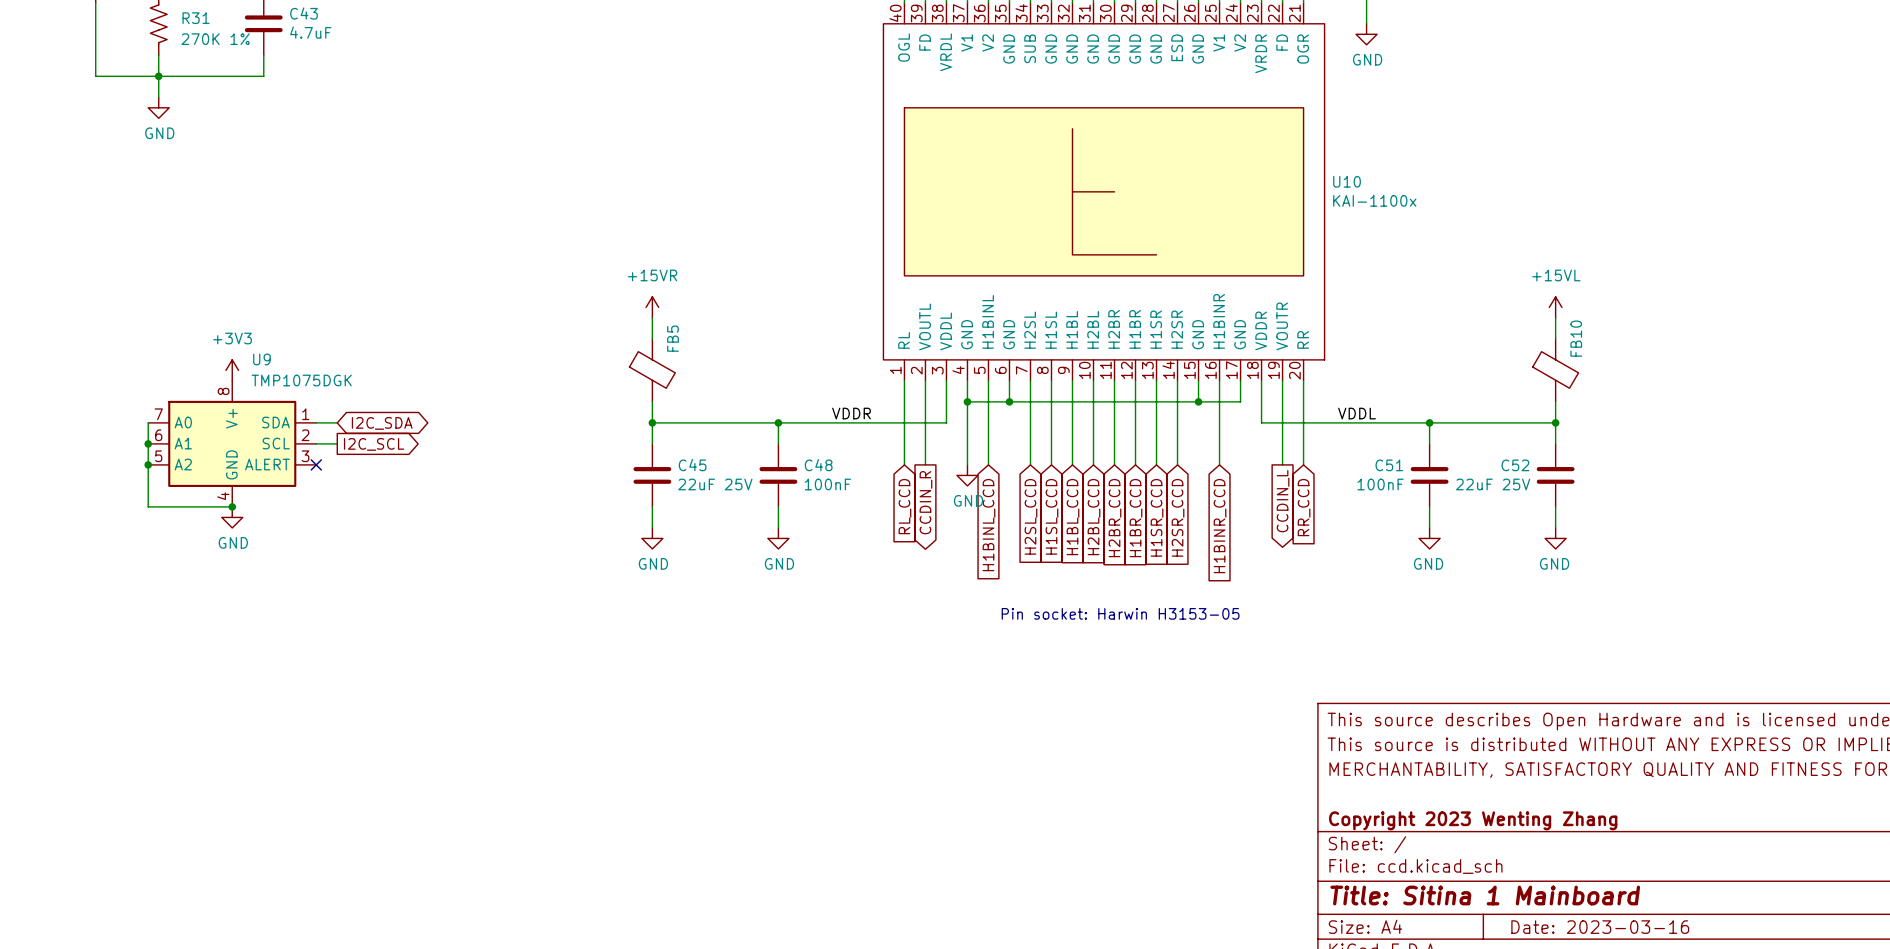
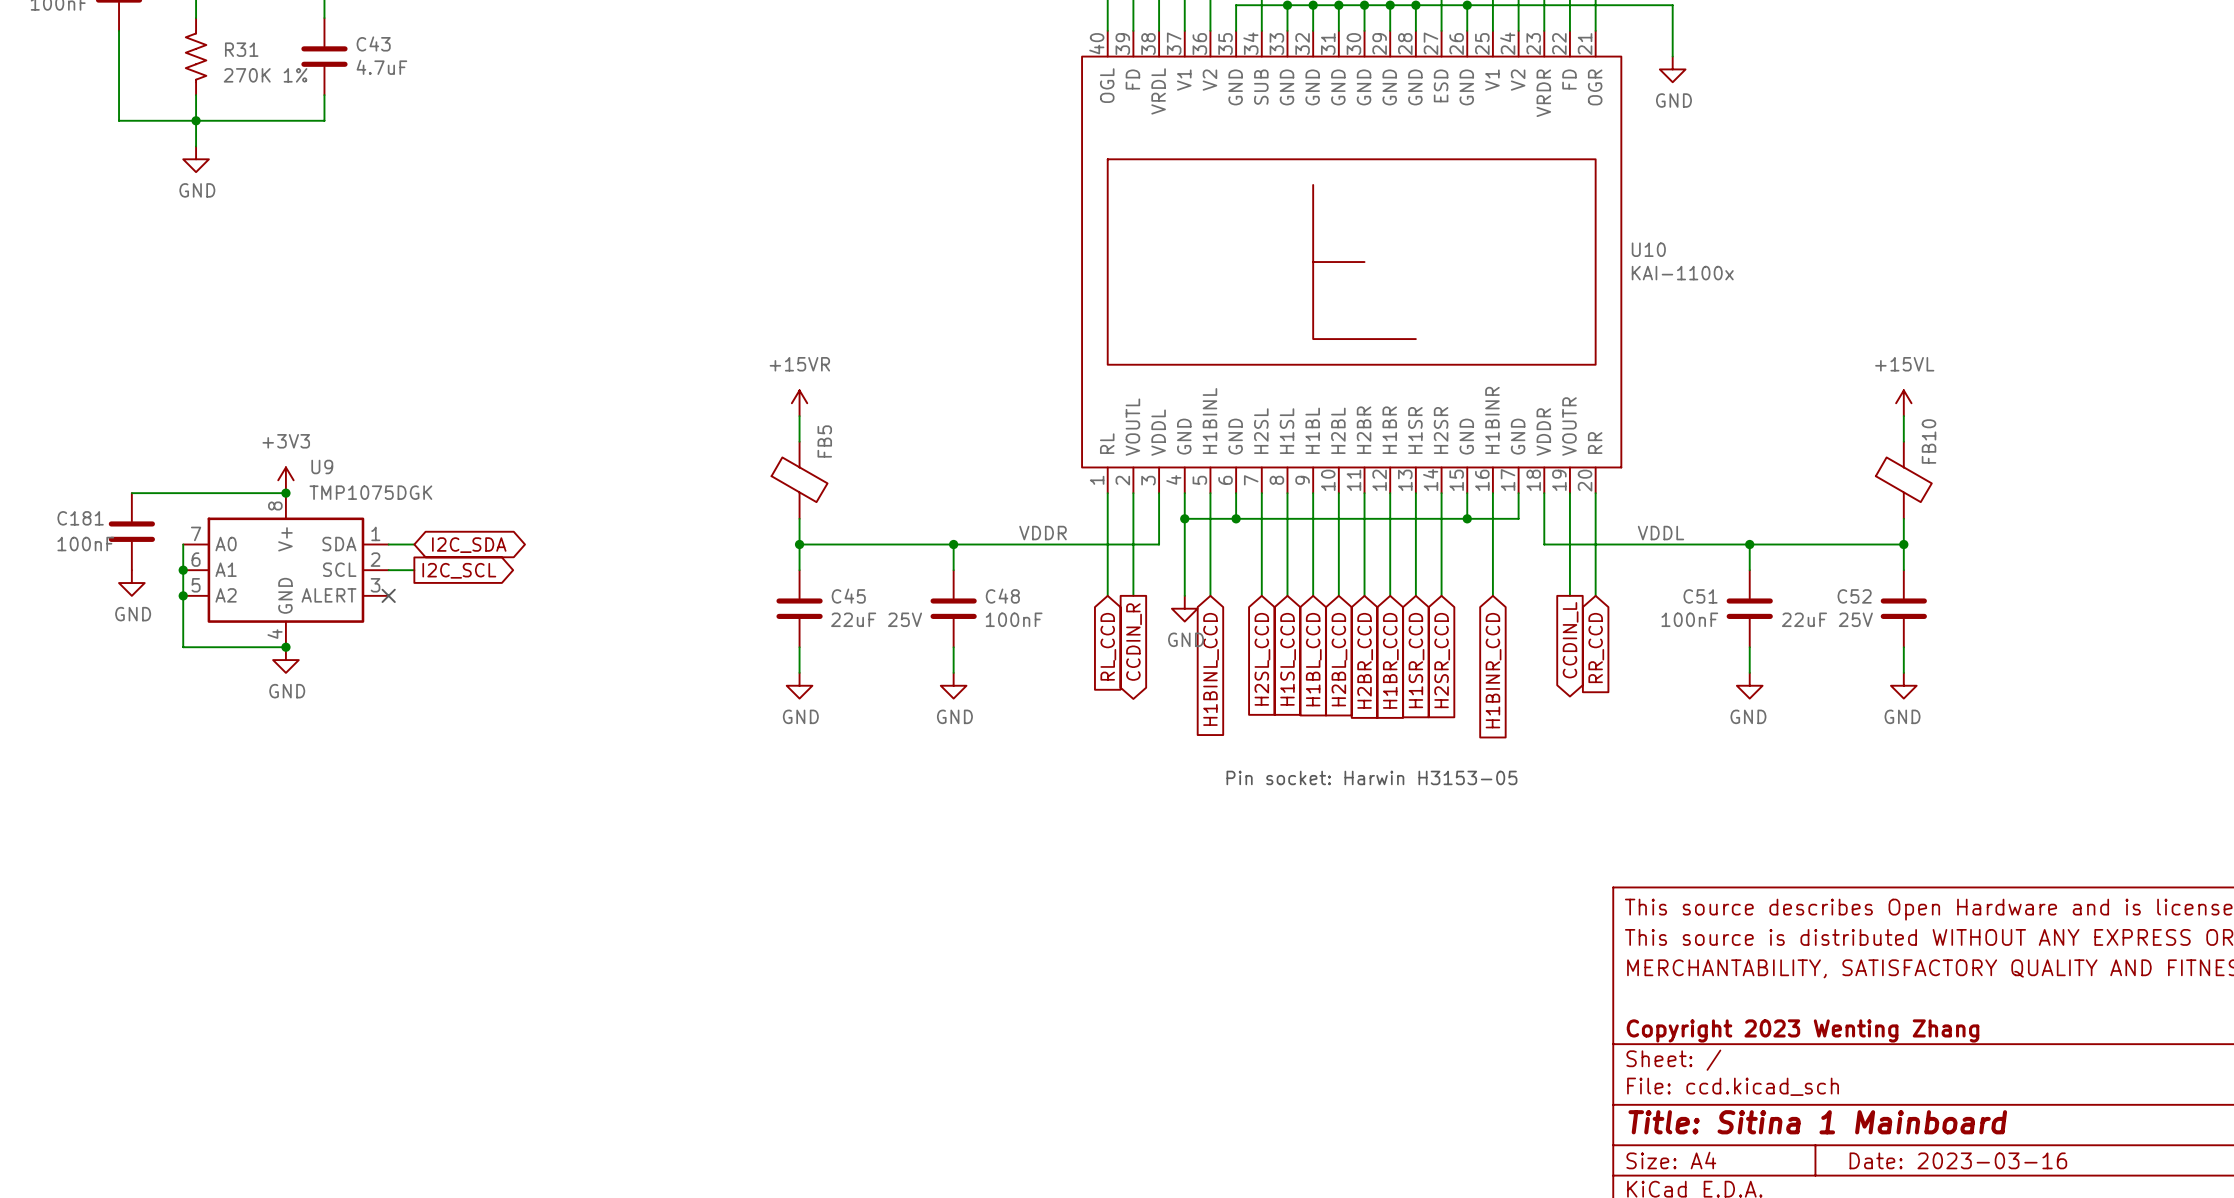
wire: none -> (131, 493) (285, 493)
junction: none -> (285, 493)
C181: none -> 100nF (131, 531)
power symbol: none -> GND (131, 583)

